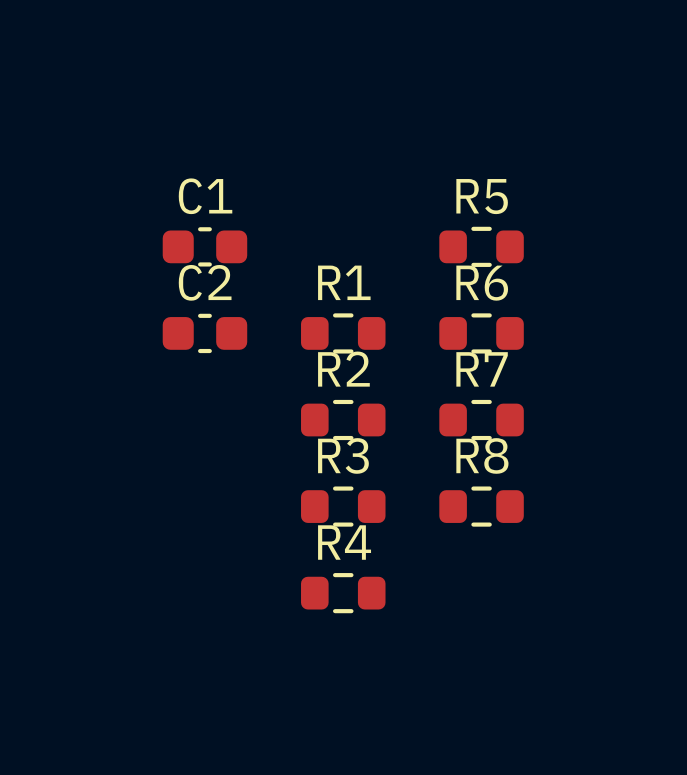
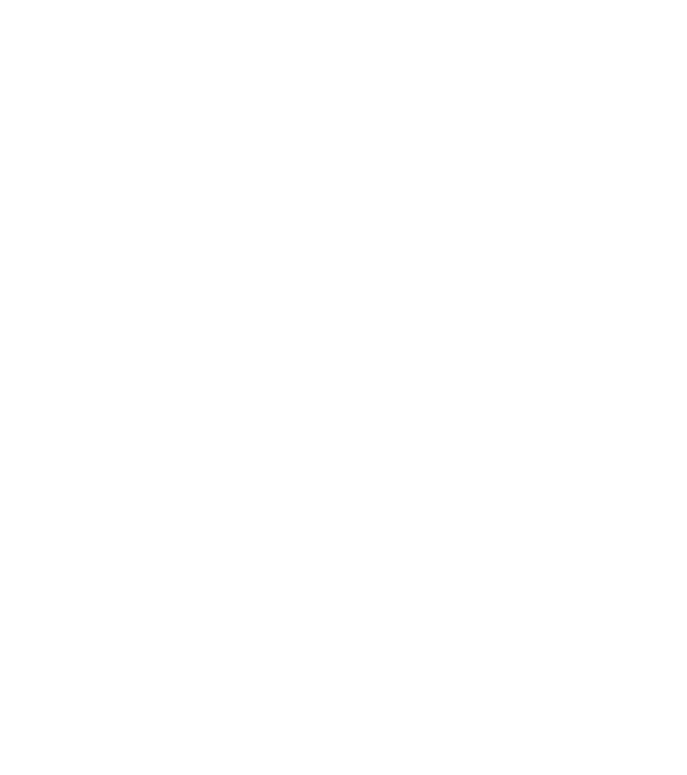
C1: (204, 246) -> none
R5: (481, 246) -> none
C2: (204, 333) -> none
R1: (343, 333) -> none
R6: (481, 333) -> none
R2: (343, 420) -> none
R7: (481, 420) -> none
R3: (343, 506) -> none
R8: (481, 506) -> none
R4: (343, 593) -> none

